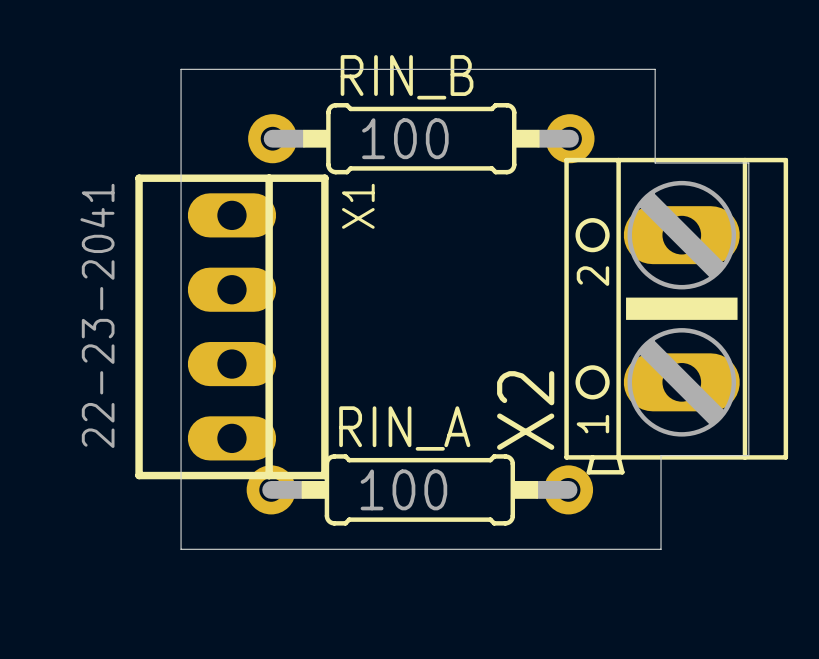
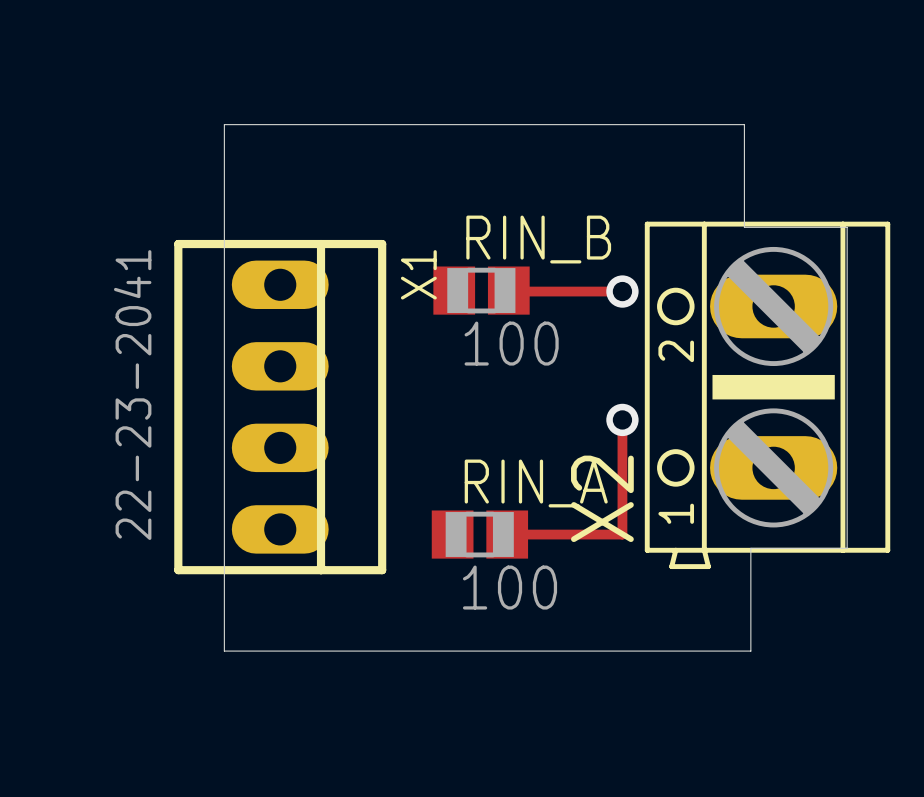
RIN_B: 100 (421, 138) -> none
RIN_B: none -> 100 (481, 290)
track: none -> (508, 290) (622, 291)
via: none -> (622, 291)
track: none -> (622, 419) (622, 534) (507, 534)
via: none -> (622, 419)
RIN_A: none -> 100 (479, 534)
RIN_A: 100 (419, 489) -> none

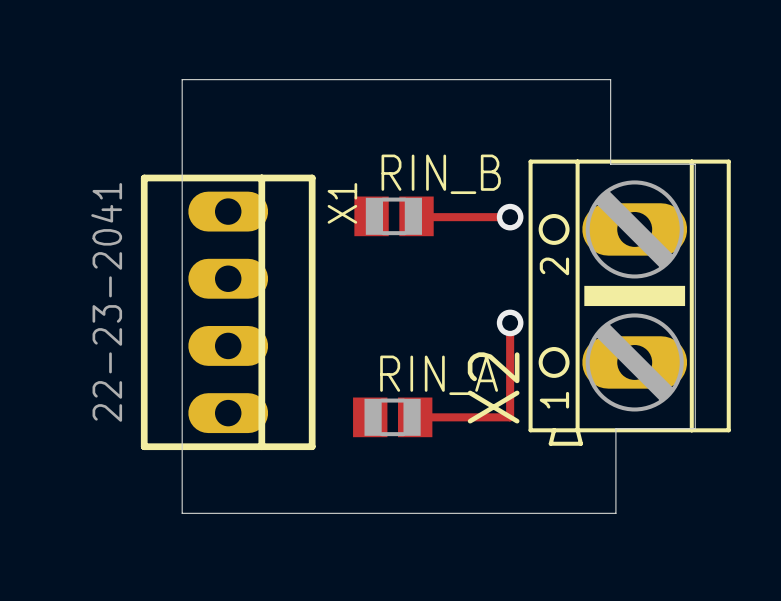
RIN_B value: 100 (511, 343) -> none
RIN_A value: 100 (510, 587) -> none

